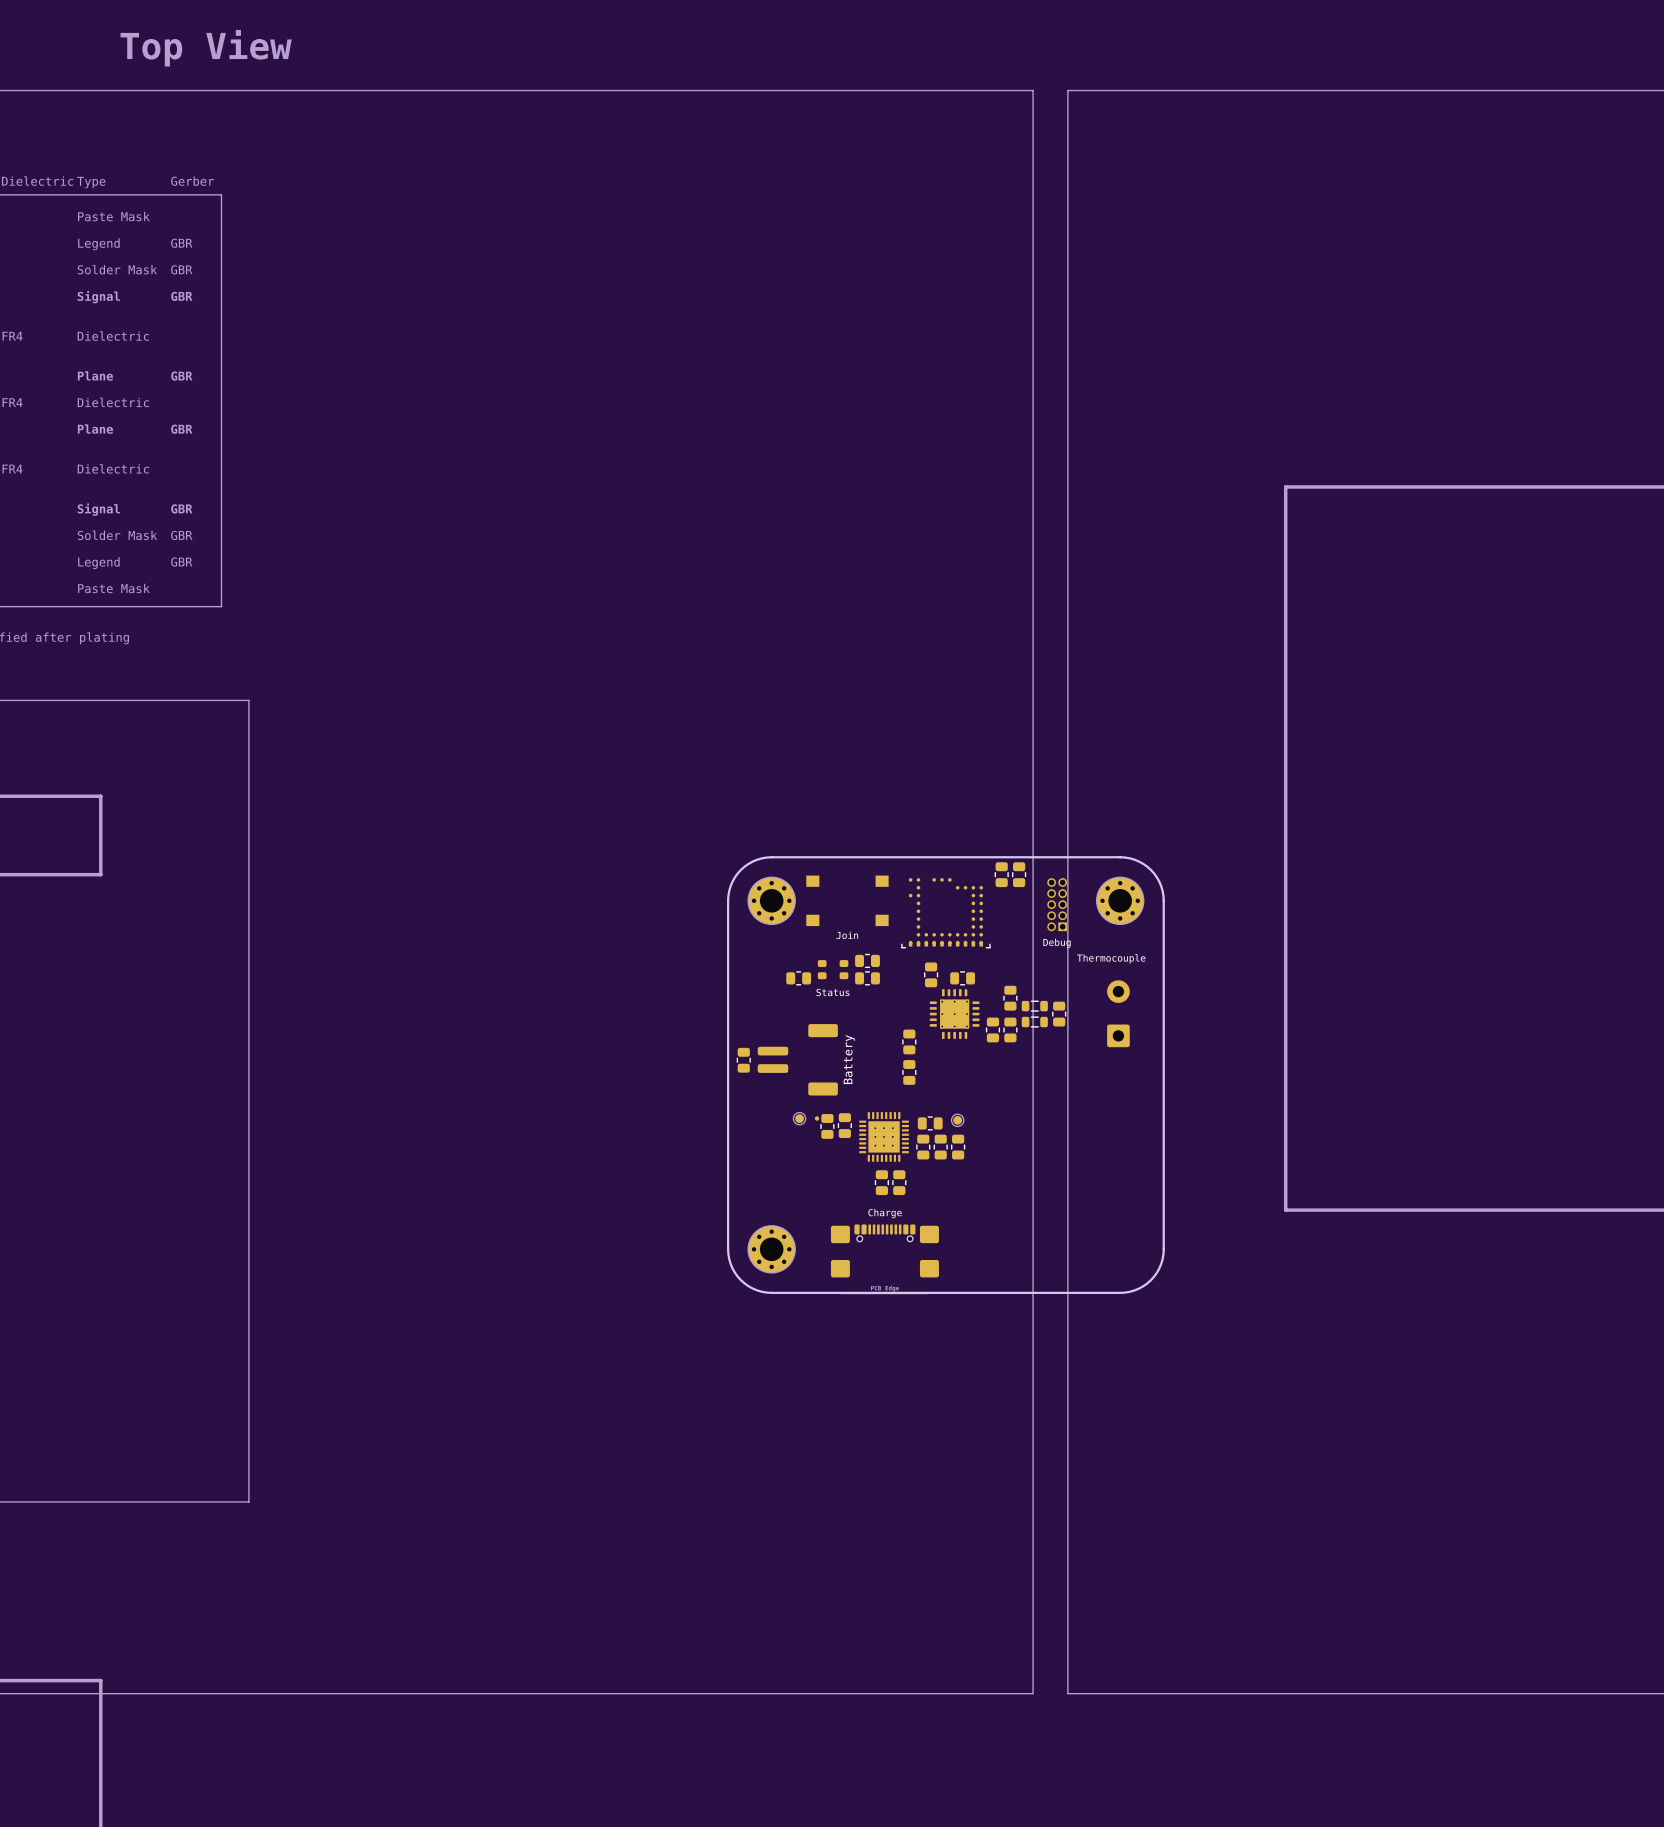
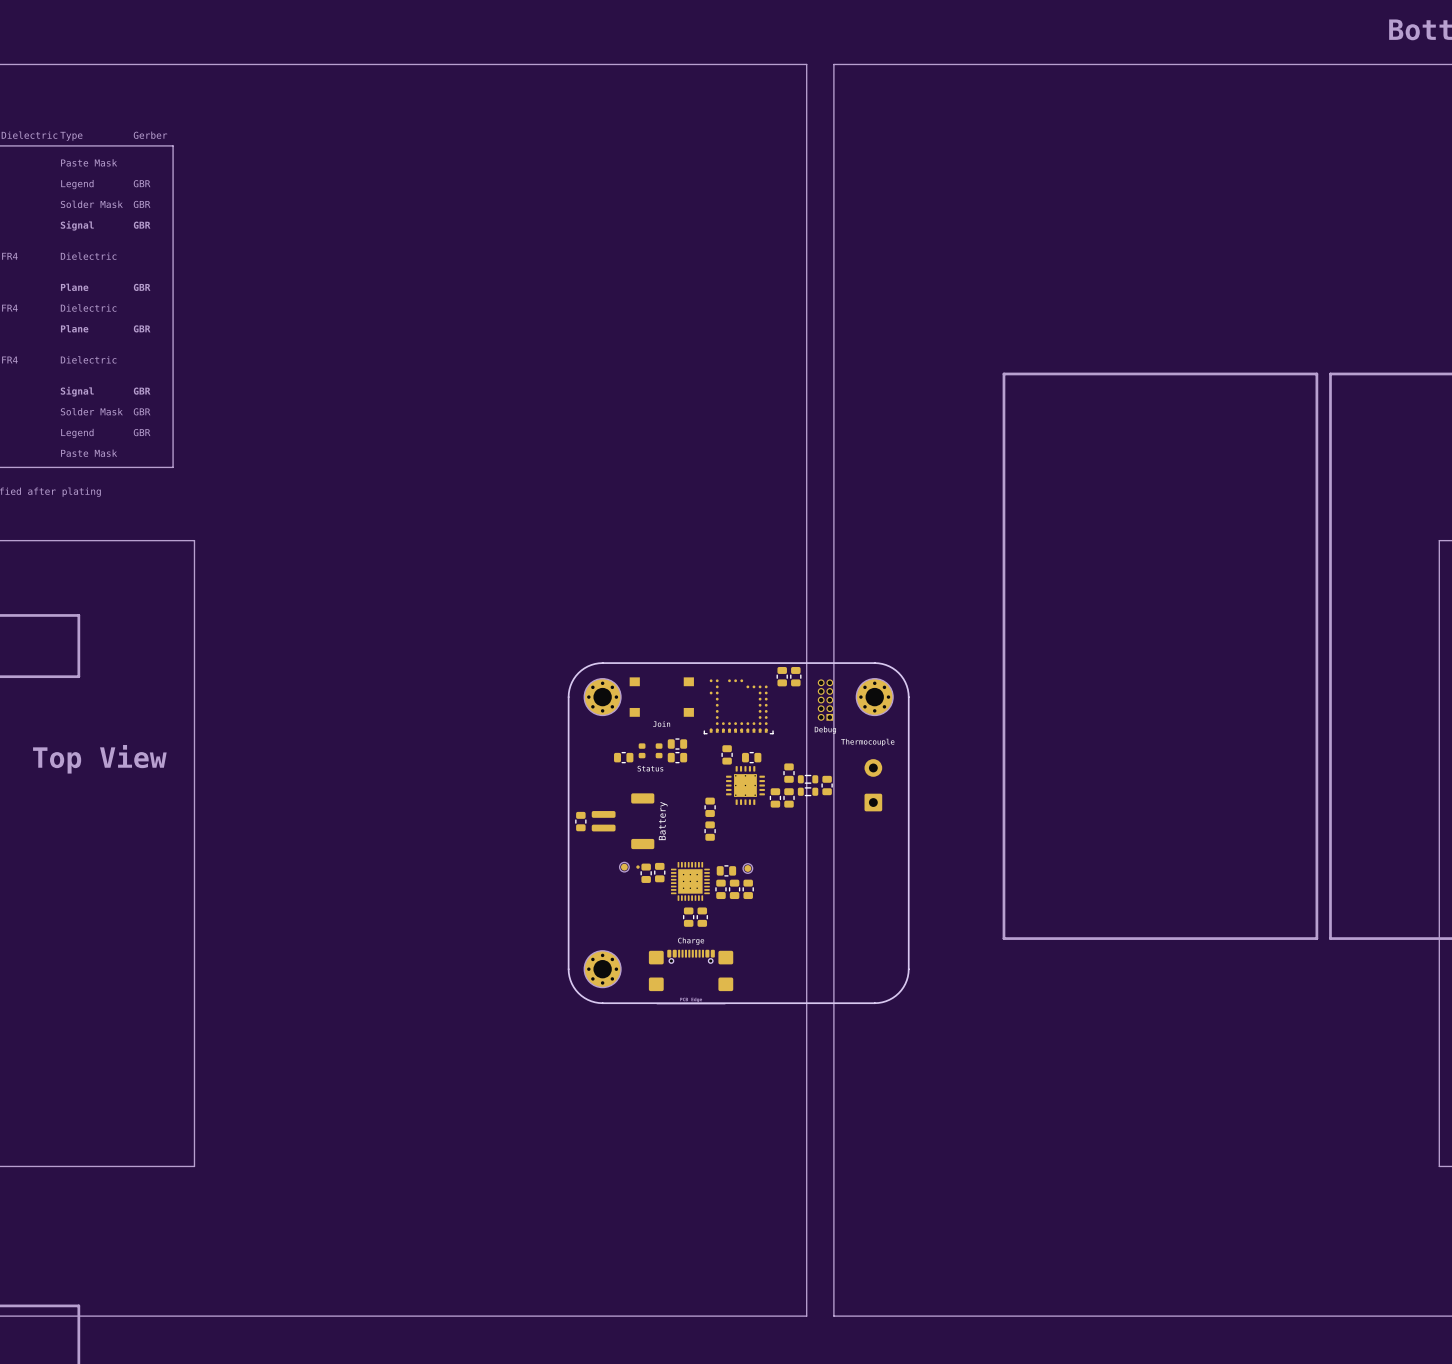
text: Top View (206, 48) -> none
text: none -> Top View (99, 759)

